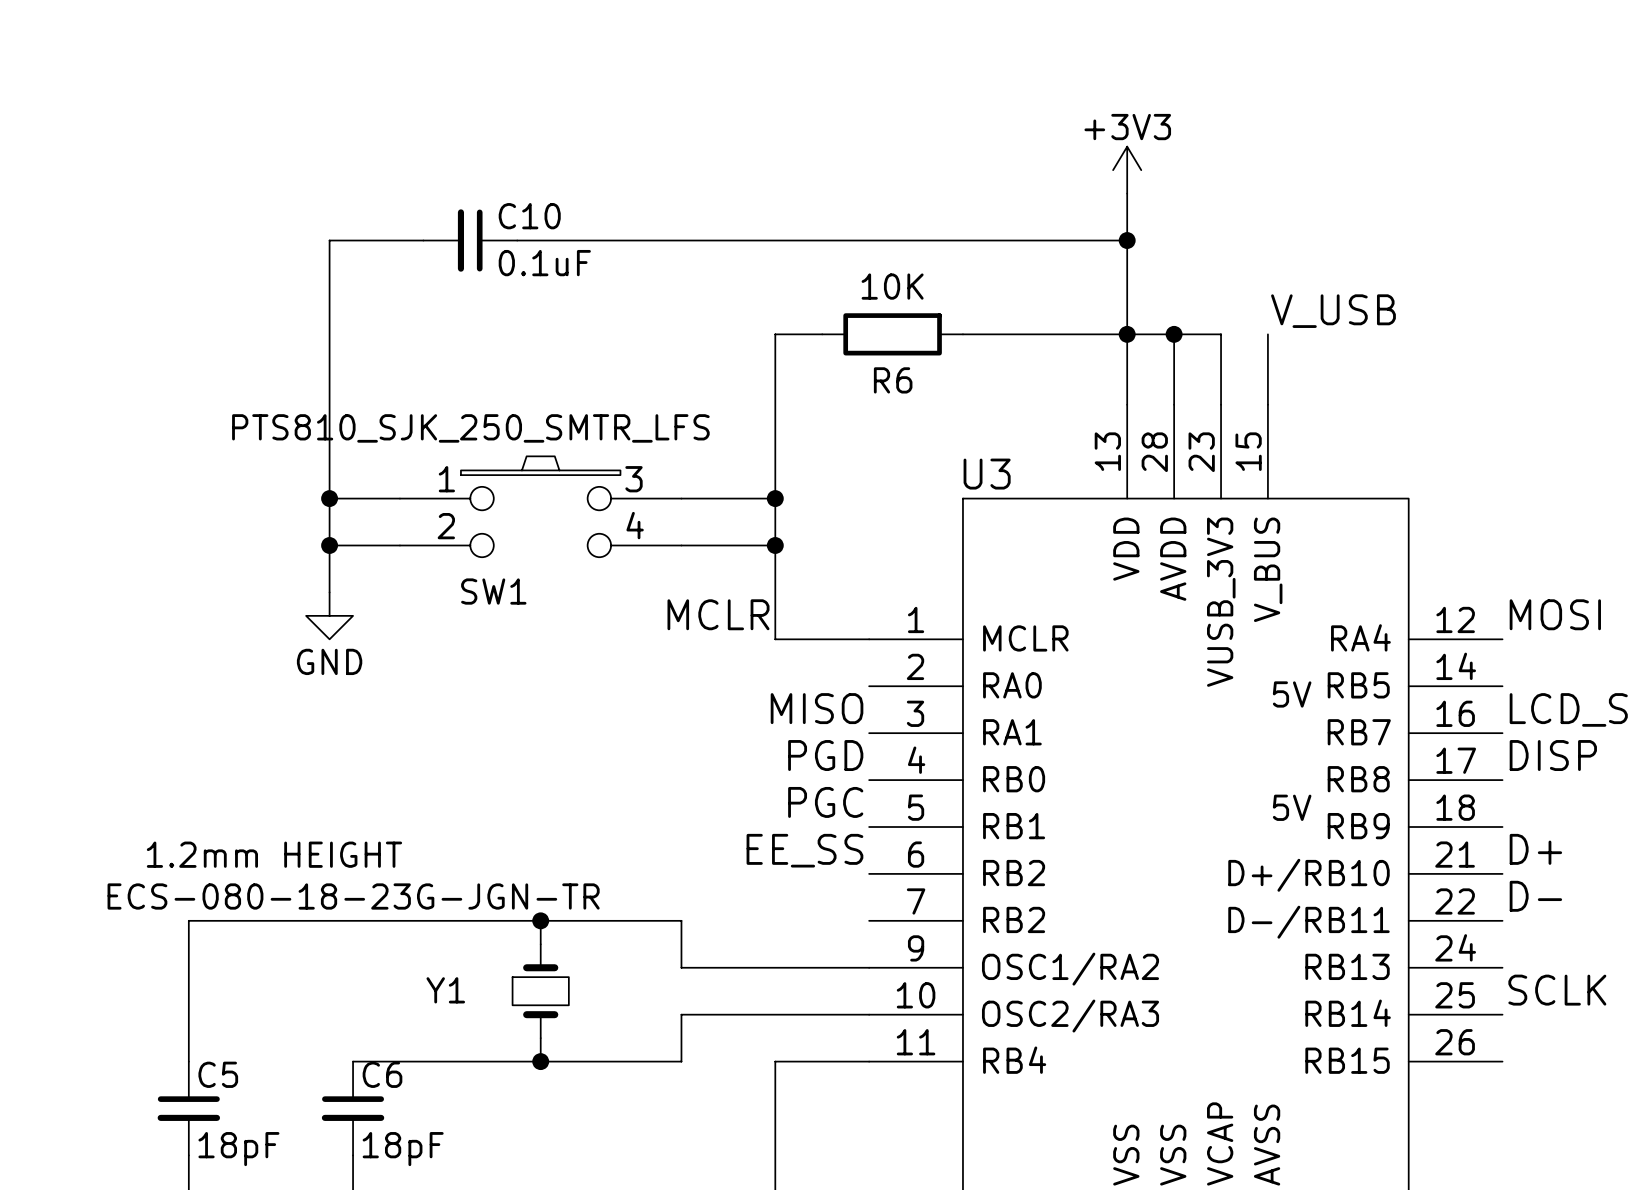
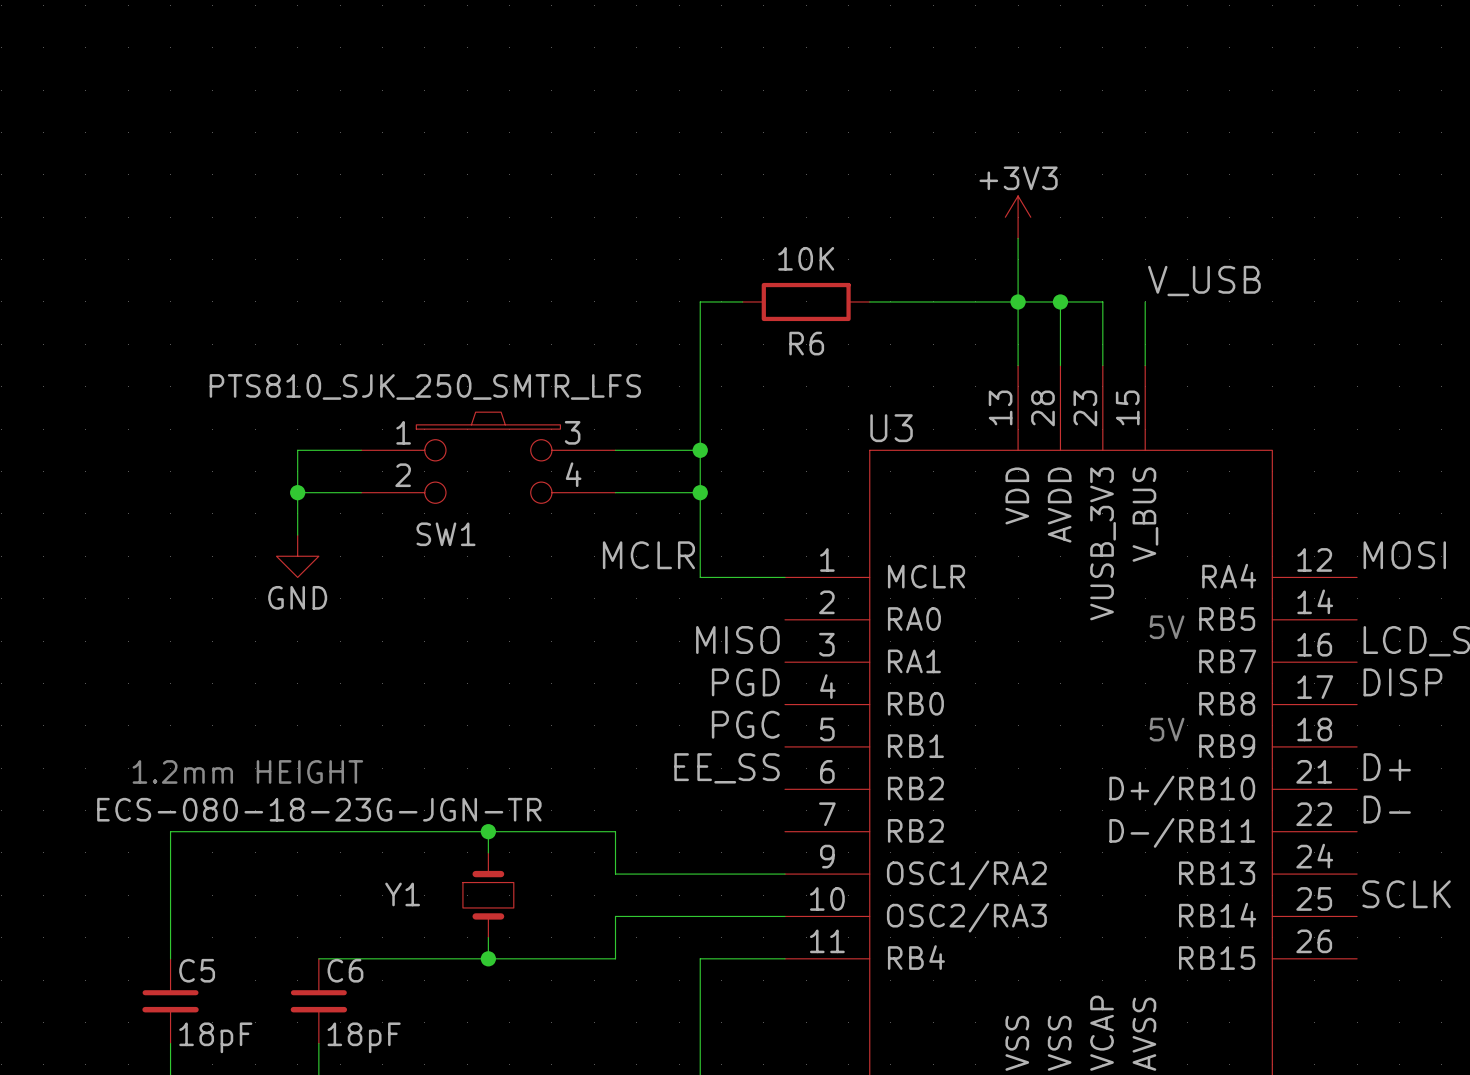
power symbol position: +3V3 (1127, 170) -> +3V3 (1018, 217)
wire: (423, 240) (329, 240) (329, 498) -> none
C10: 0.1uF (470, 240) -> none
wire: (517, 240) (1127, 240) -> none
junction: (1127, 240) -> none
junction: (329, 498) -> none

